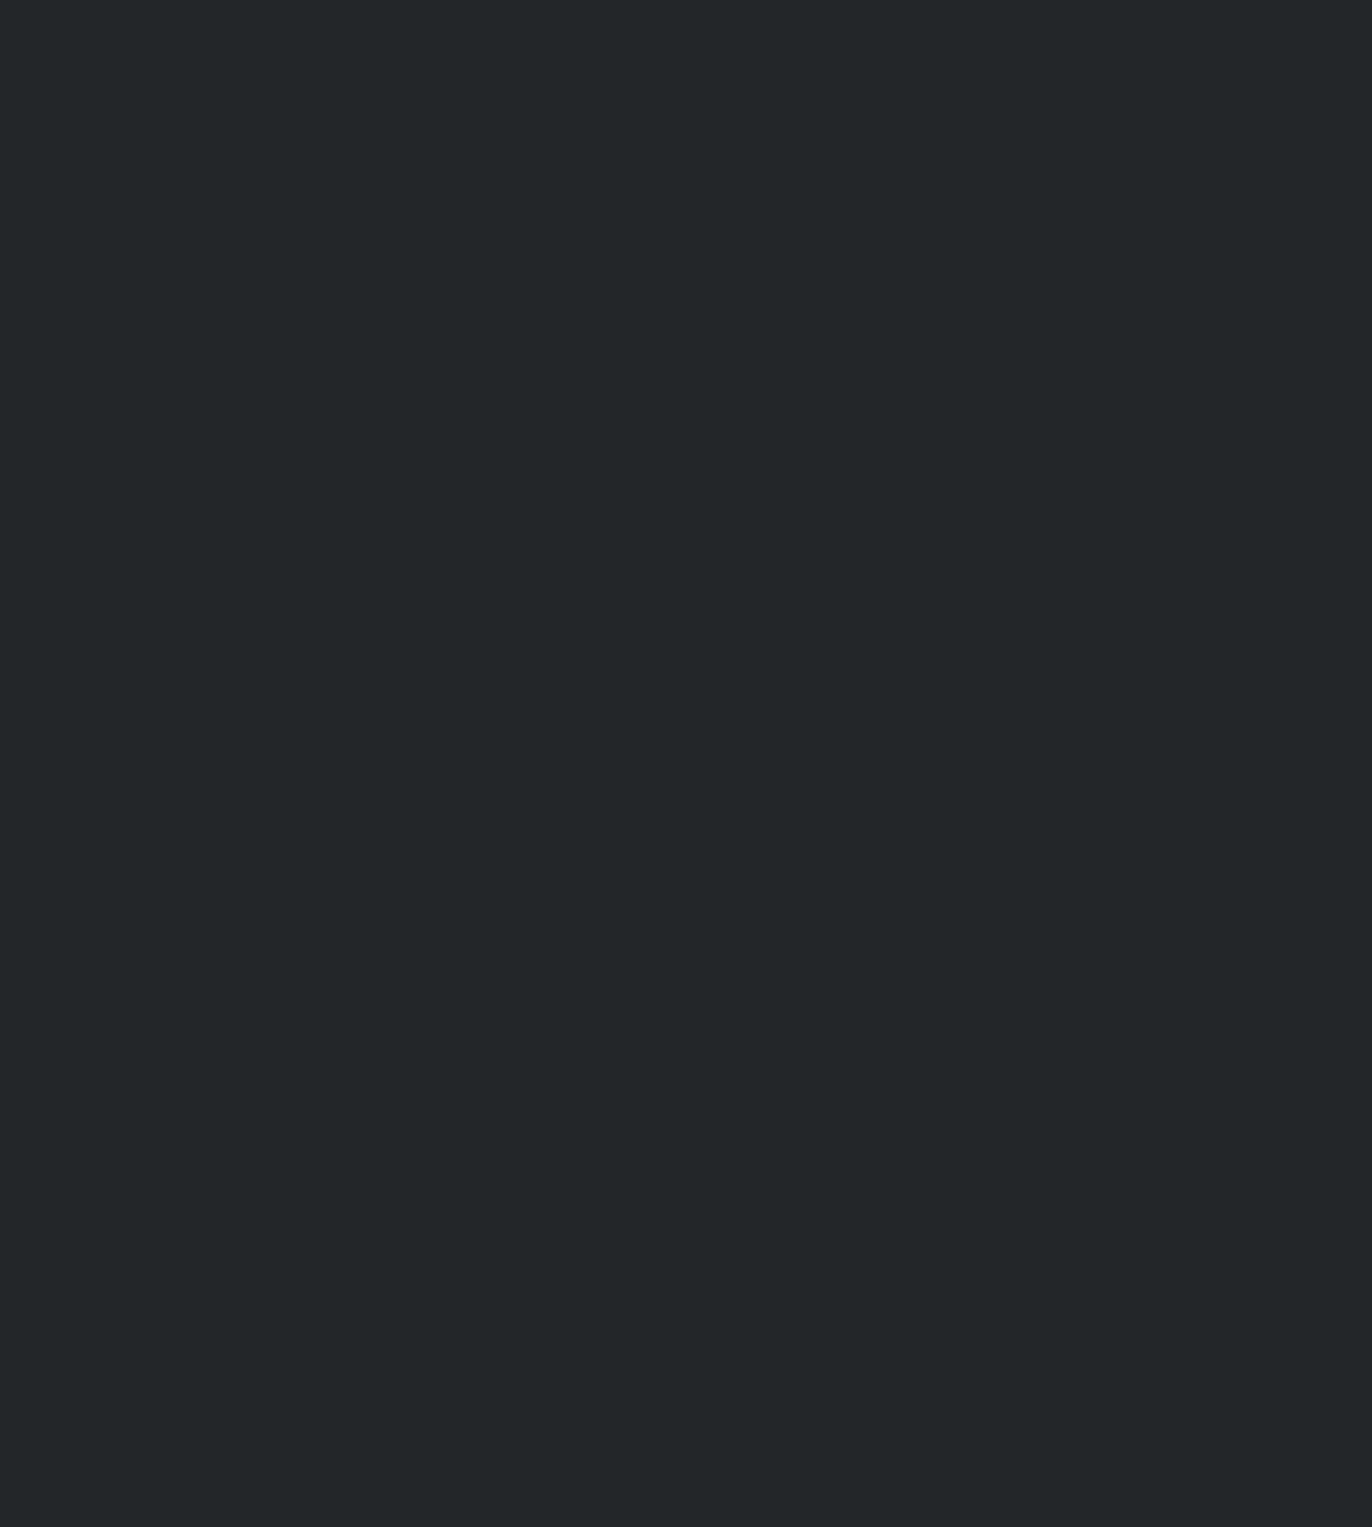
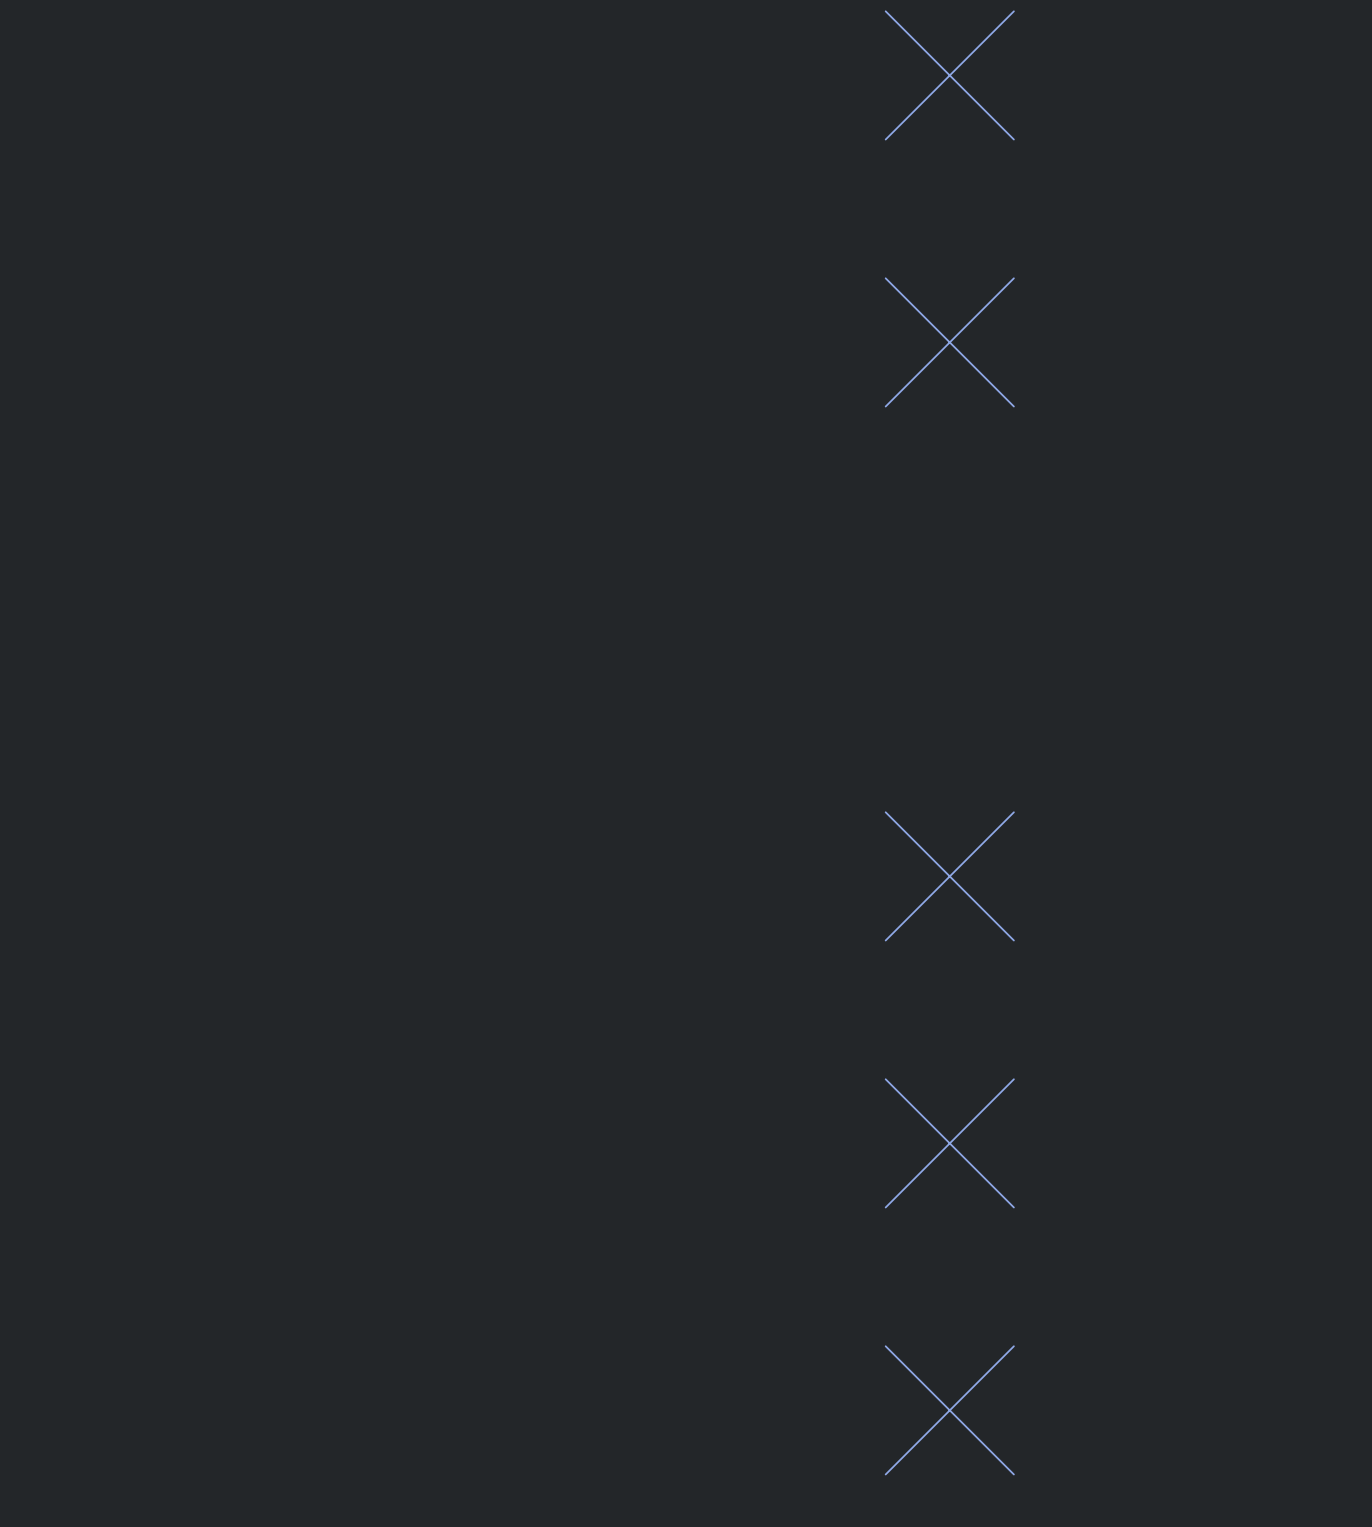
no-connect mark: none -> (949, 75)
no-connect mark: none -> (949, 342)
no-connect mark: none -> (949, 876)
no-connect mark: none -> (949, 1143)
no-connect mark: none -> (949, 1410)

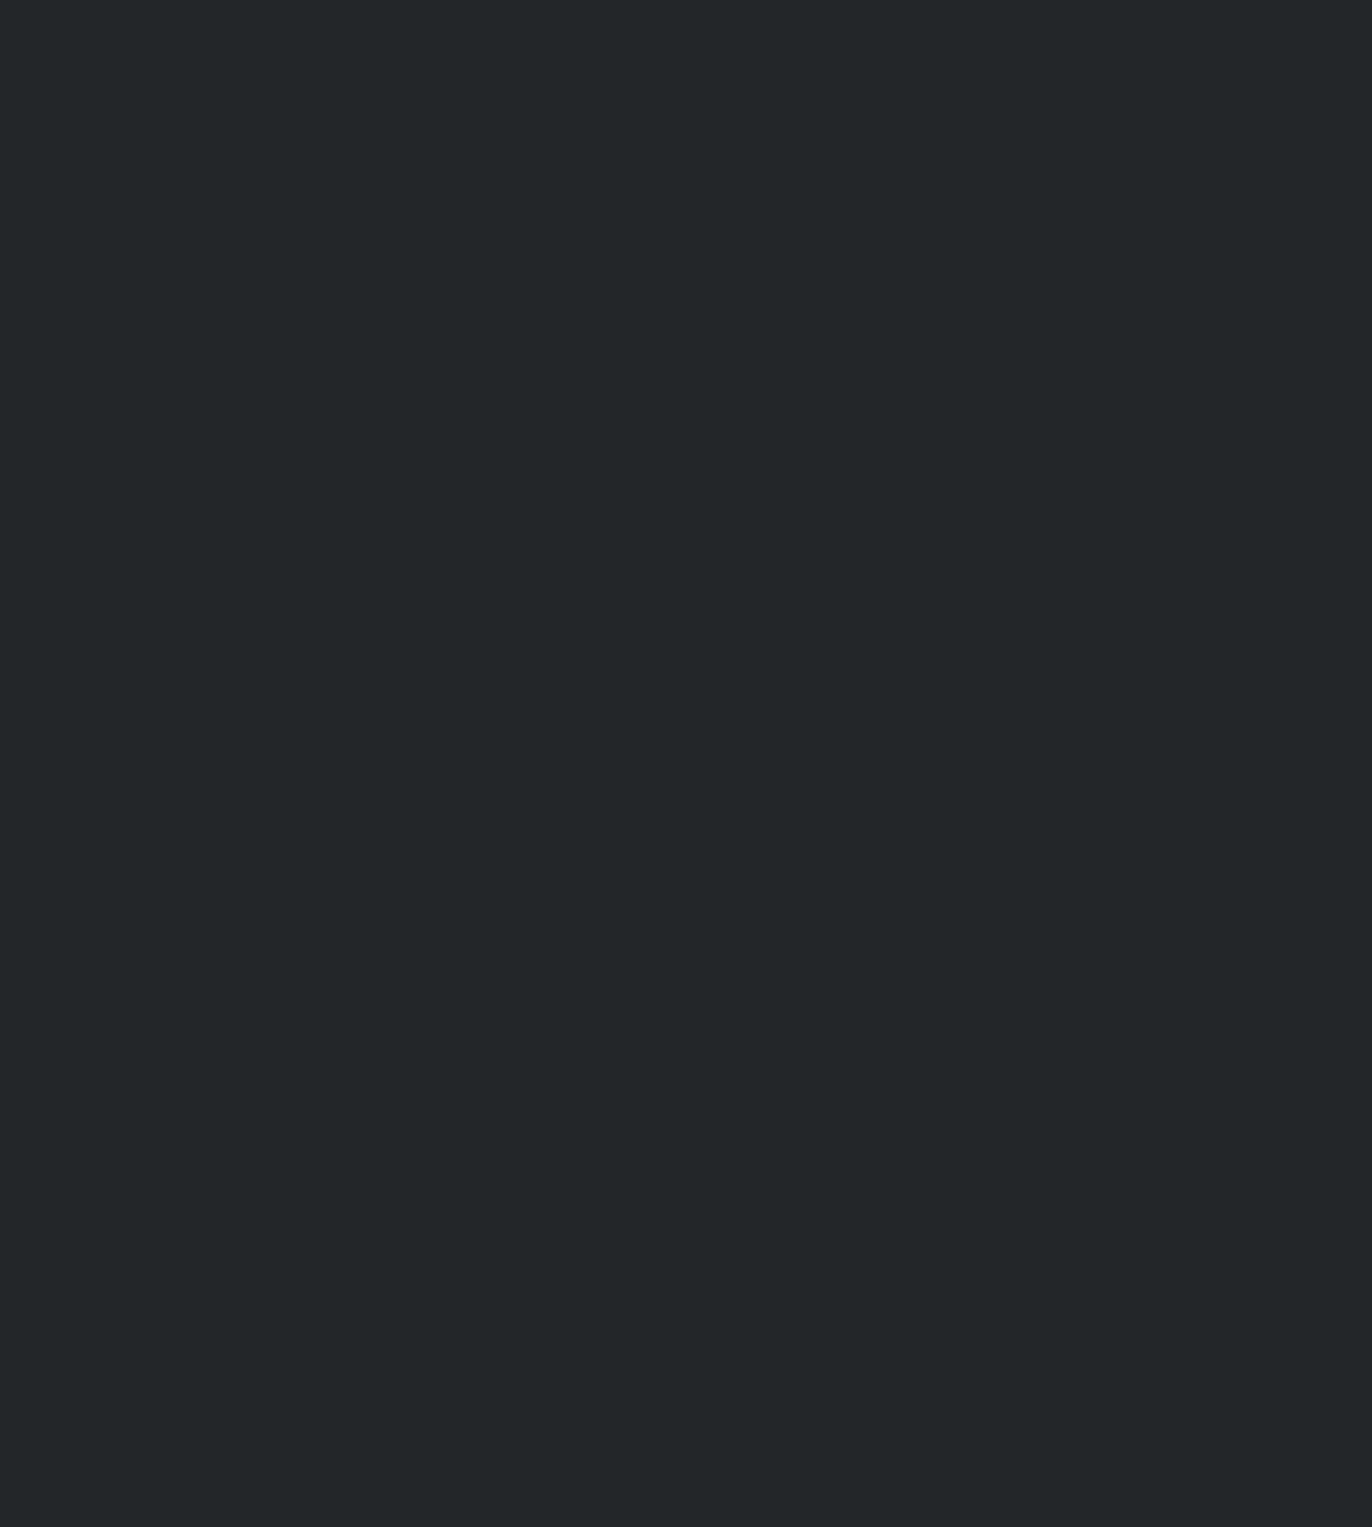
no-connect mark: (949, 75) -> none
no-connect mark: (949, 342) -> none
no-connect mark: (949, 876) -> none
no-connect mark: (949, 1143) -> none
no-connect mark: (949, 1410) -> none

